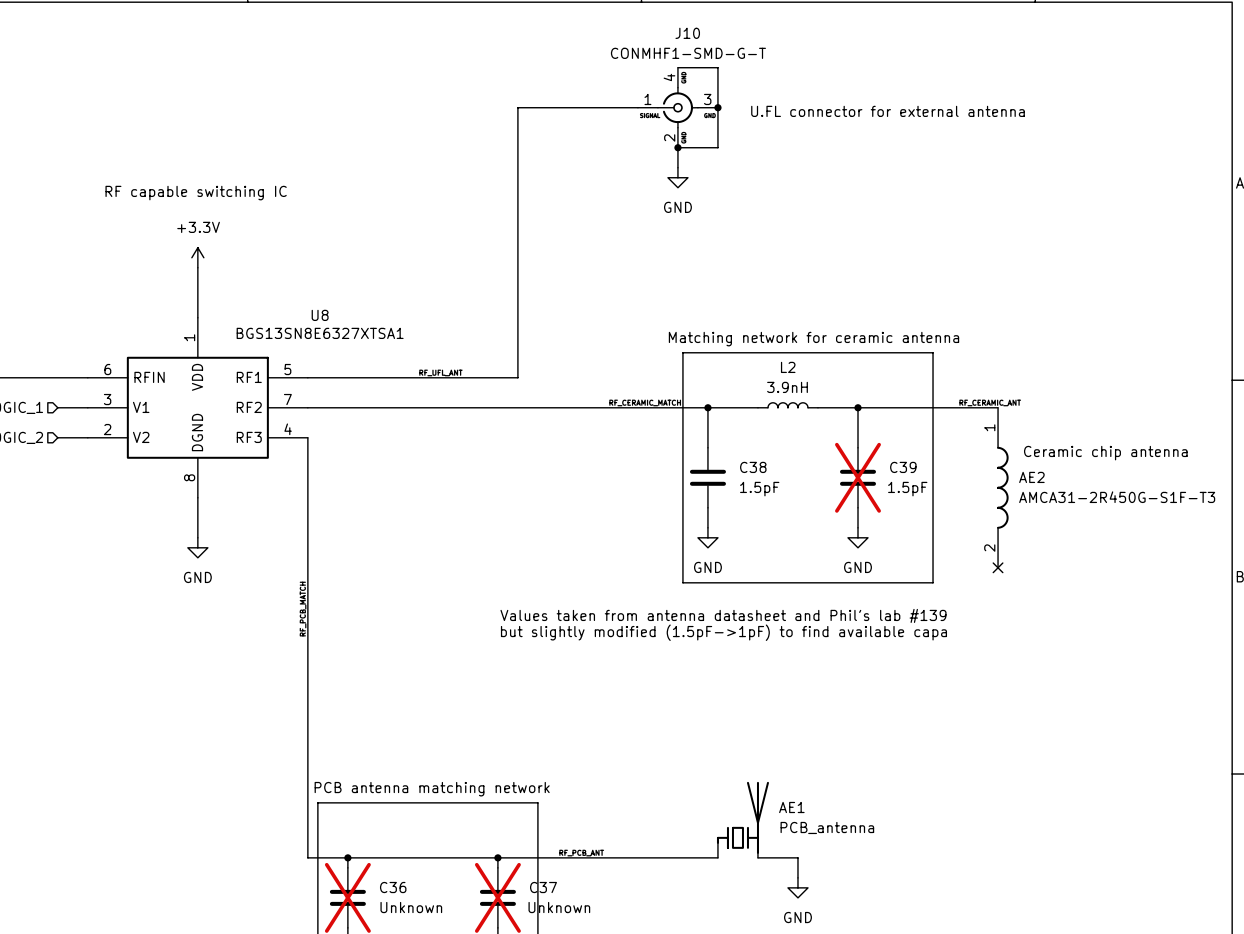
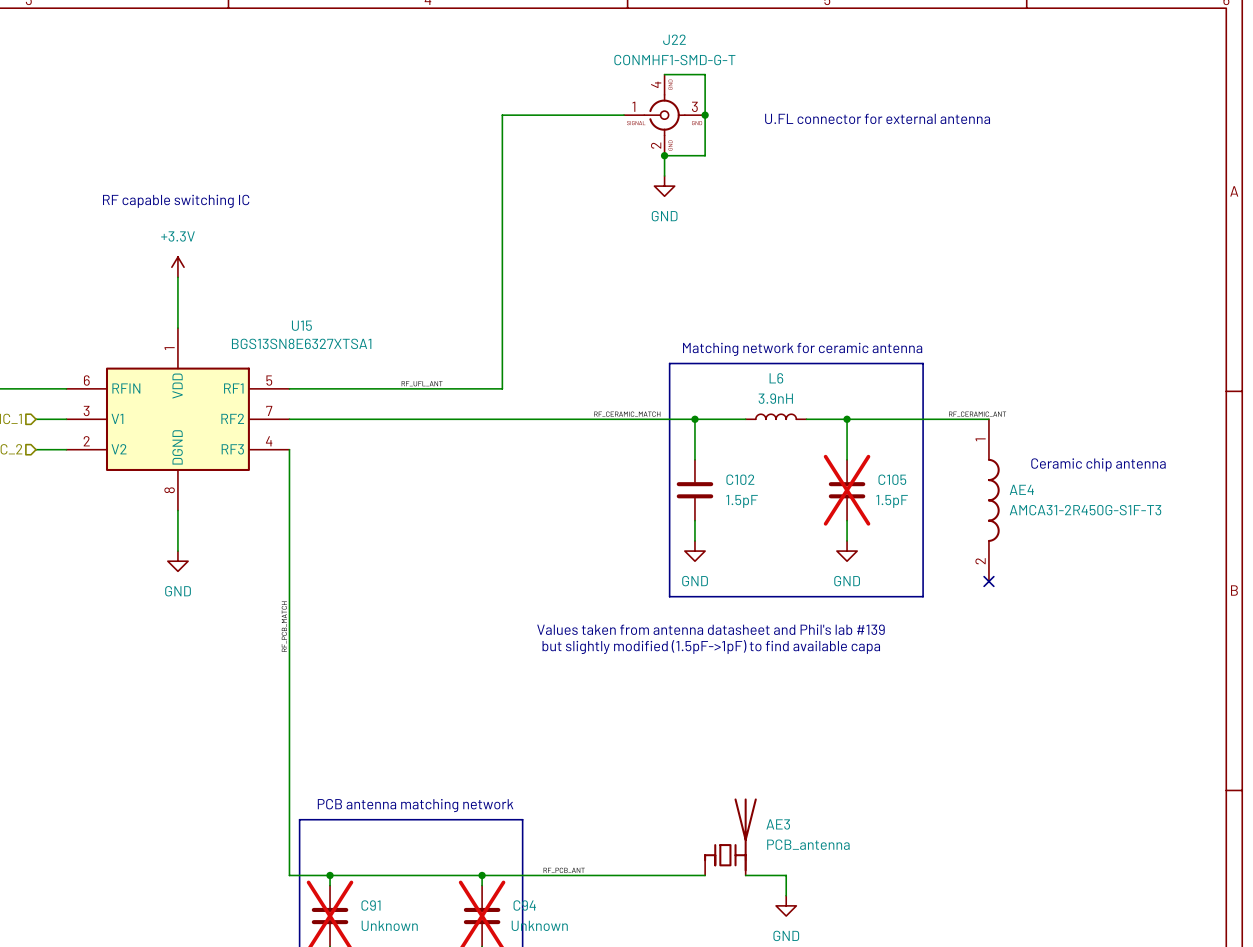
J10 name: J10 (687, 33) -> J22 (674, 39)
U8 name: U8 (320, 315) -> U15 (301, 325)
L2 name: L2 (788, 367) -> L6 (776, 378)
C38 name: C38 (753, 467) -> C102 (740, 479)
C39 name: C39 (903, 467) -> C105 (892, 479)
AE2 name: AE2 (1031, 477) -> AE4 (1021, 489)
AE1 name: AE1 (791, 807) -> AE3 (778, 824)
C36 name: C36 (393, 887) -> C91 (370, 905)
C37 name: C37 (543, 887) -> C94 (524, 905)

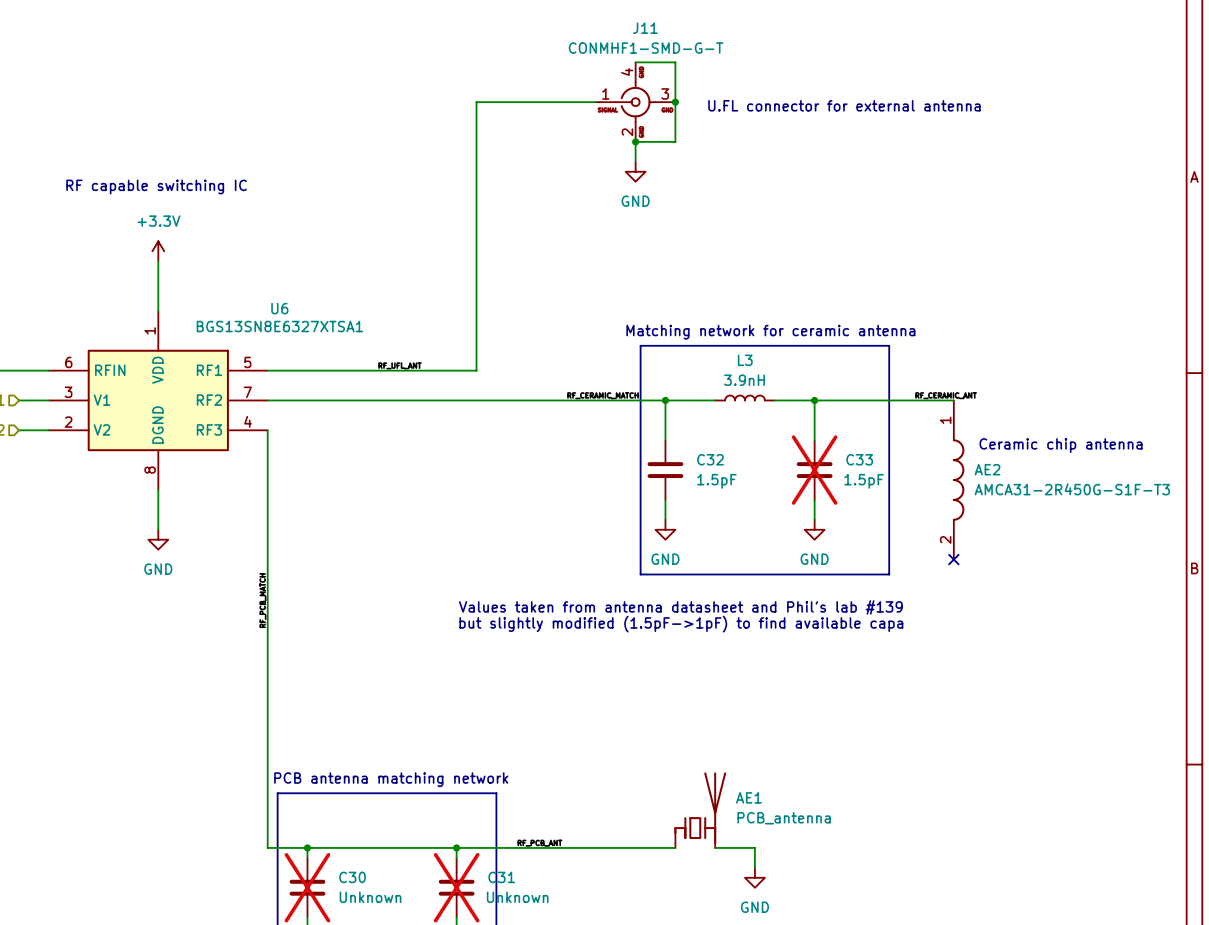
J22 name: J22 (674, 39) -> J11 (645, 28)
U15 name: U15 (301, 325) -> U6 (279, 308)
L6 name: L6 (776, 378) -> L3 (745, 360)
C102 name: C102 (740, 479) -> C32 (710, 459)
C105 name: C105 (892, 479) -> C33 (859, 459)
AE4 name: AE4 (1021, 489) -> AE2 (987, 469)
AE3 name: AE3 (778, 824) -> AE1 (748, 797)
C91 name: C91 (370, 905) -> C30 (352, 877)
C94 name: C94 (524, 905) -> C31 (501, 877)

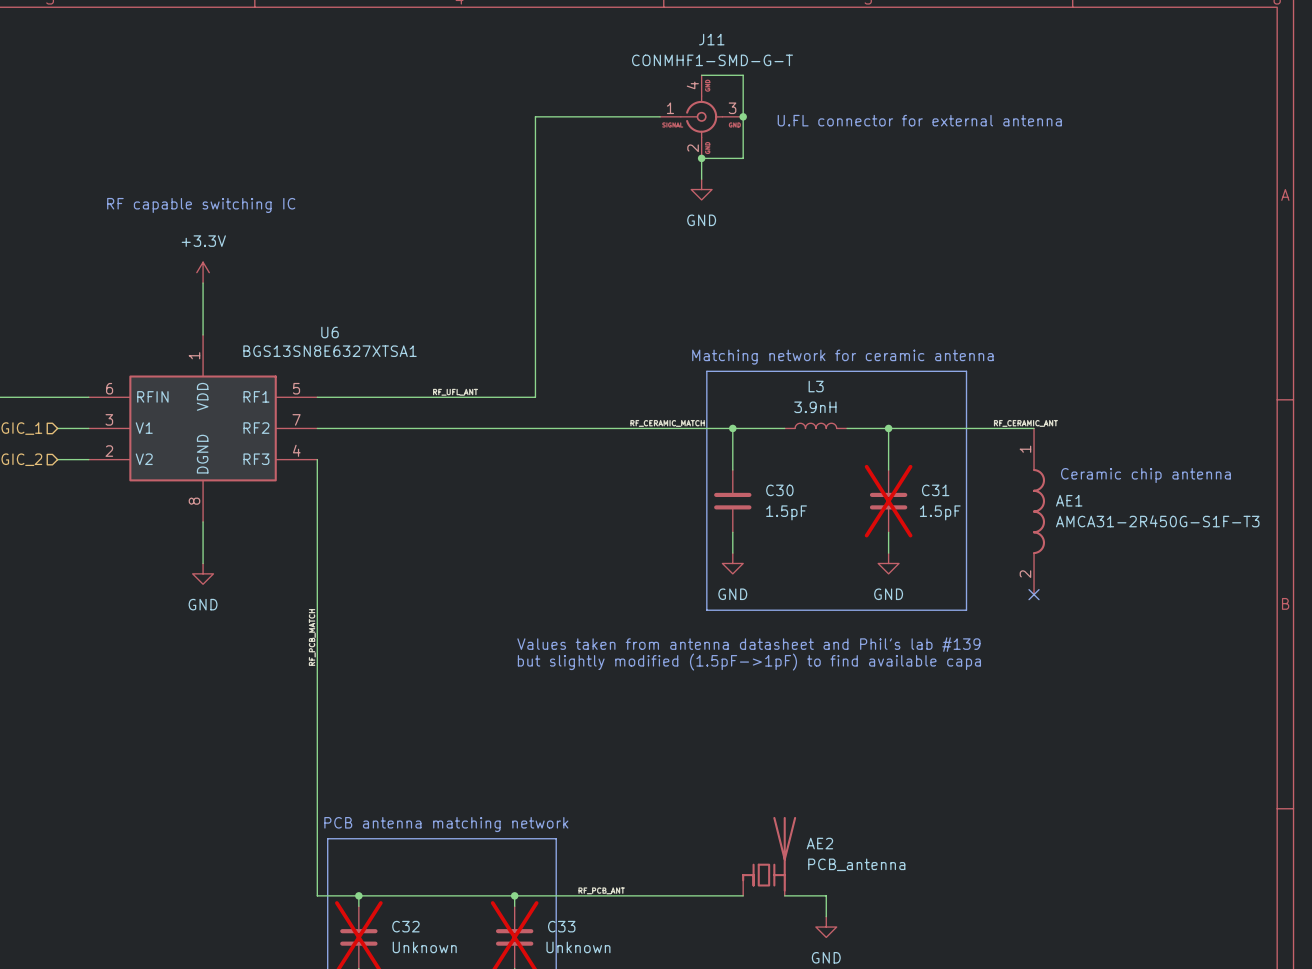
C32 name: C32 (710, 459) -> C30 (779, 490)
C33 name: C33 (859, 459) -> C31 (935, 490)
AE2 name: AE2 (987, 469) -> AE1 (1069, 500)
AE1 name: AE1 (748, 797) -> AE2 (819, 843)
C30 name: C30 (352, 877) -> C32 (405, 926)
C31 name: C31 (501, 877) -> C33 (561, 926)

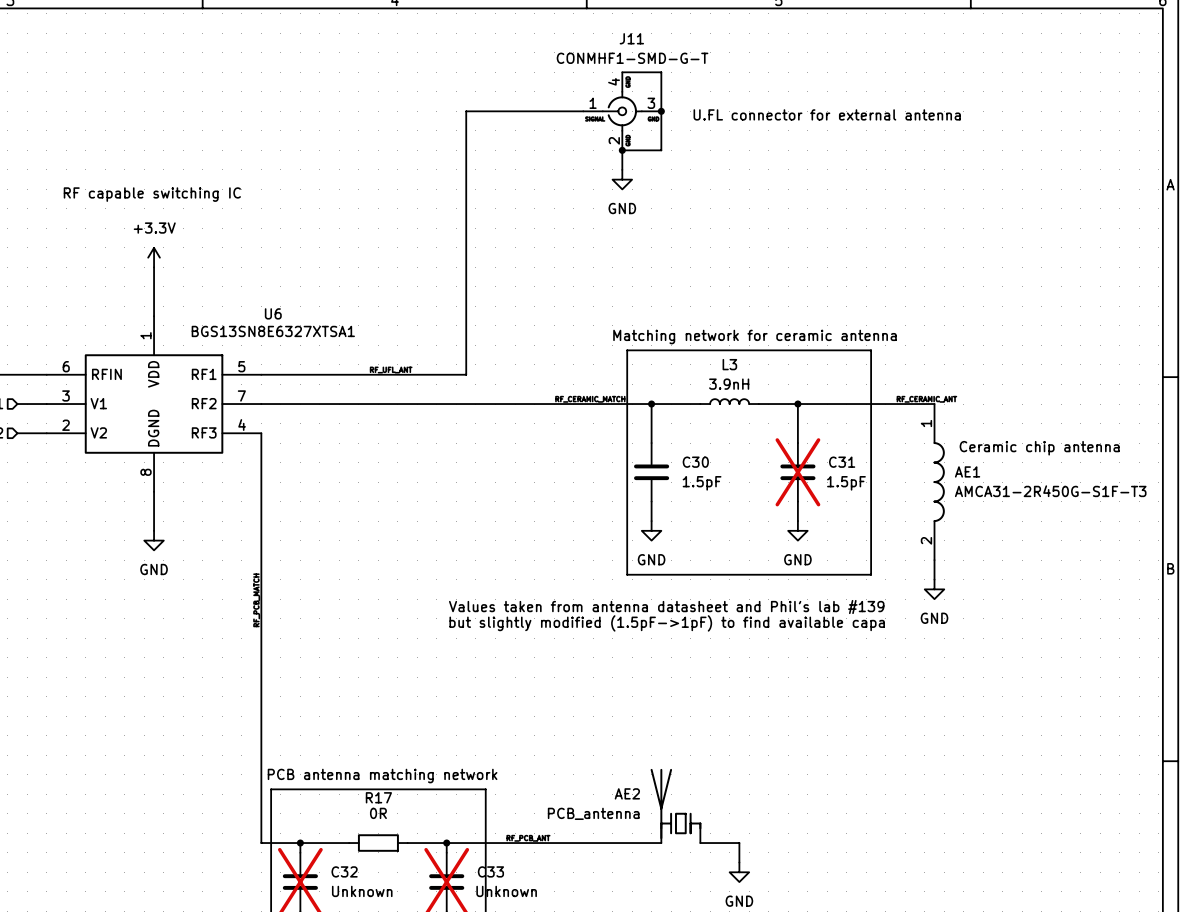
wire: none -> (934, 560) (934, 579)
no-connect mark: (1034, 594) -> none
power symbol: none -> GND (934, 589)
AE2 flip: as is (769, 854) -> left-right (675, 804)
wire: (410, 895) (473, 895) -> none
R17: none -> 0R (378, 843)

